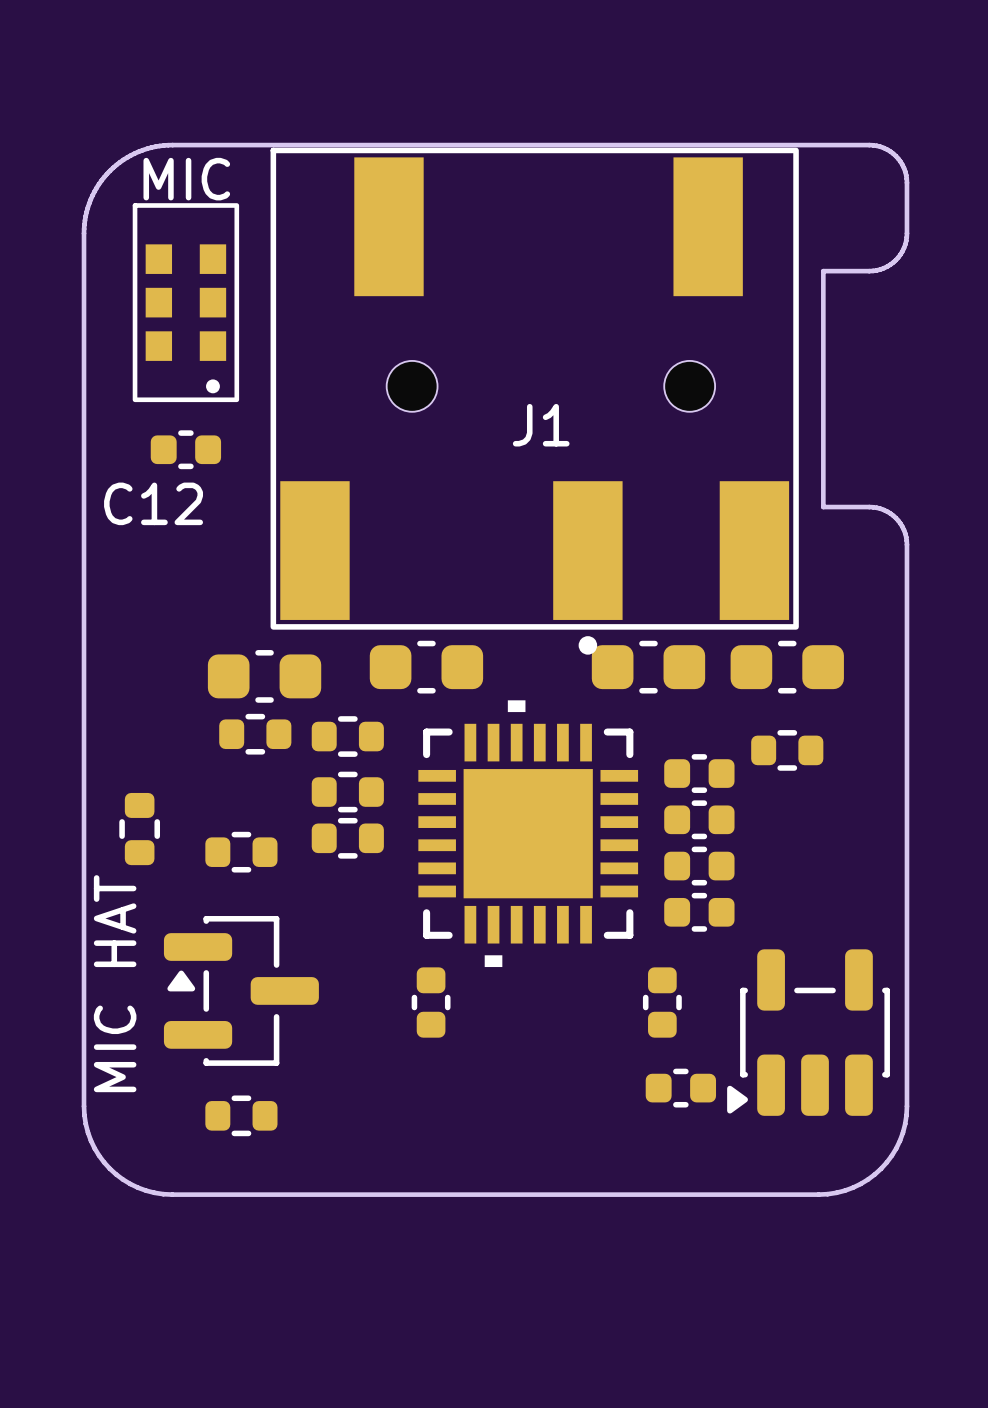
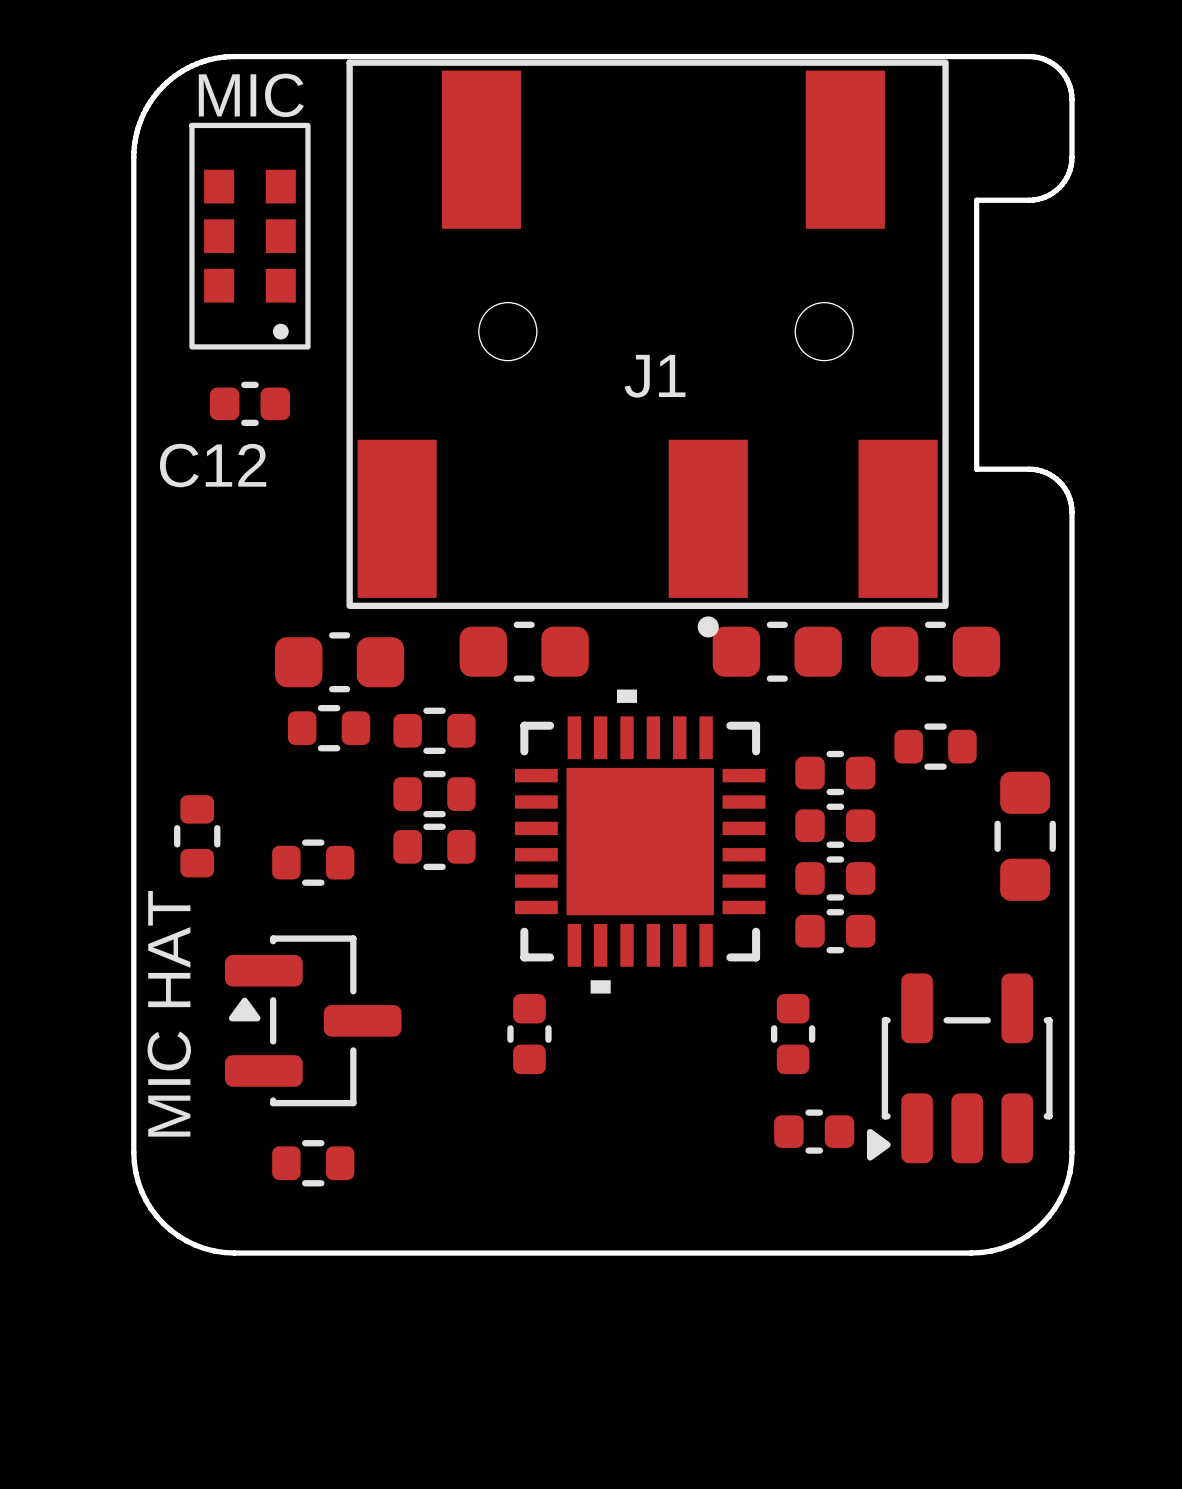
part: none -> (1025, 836)

